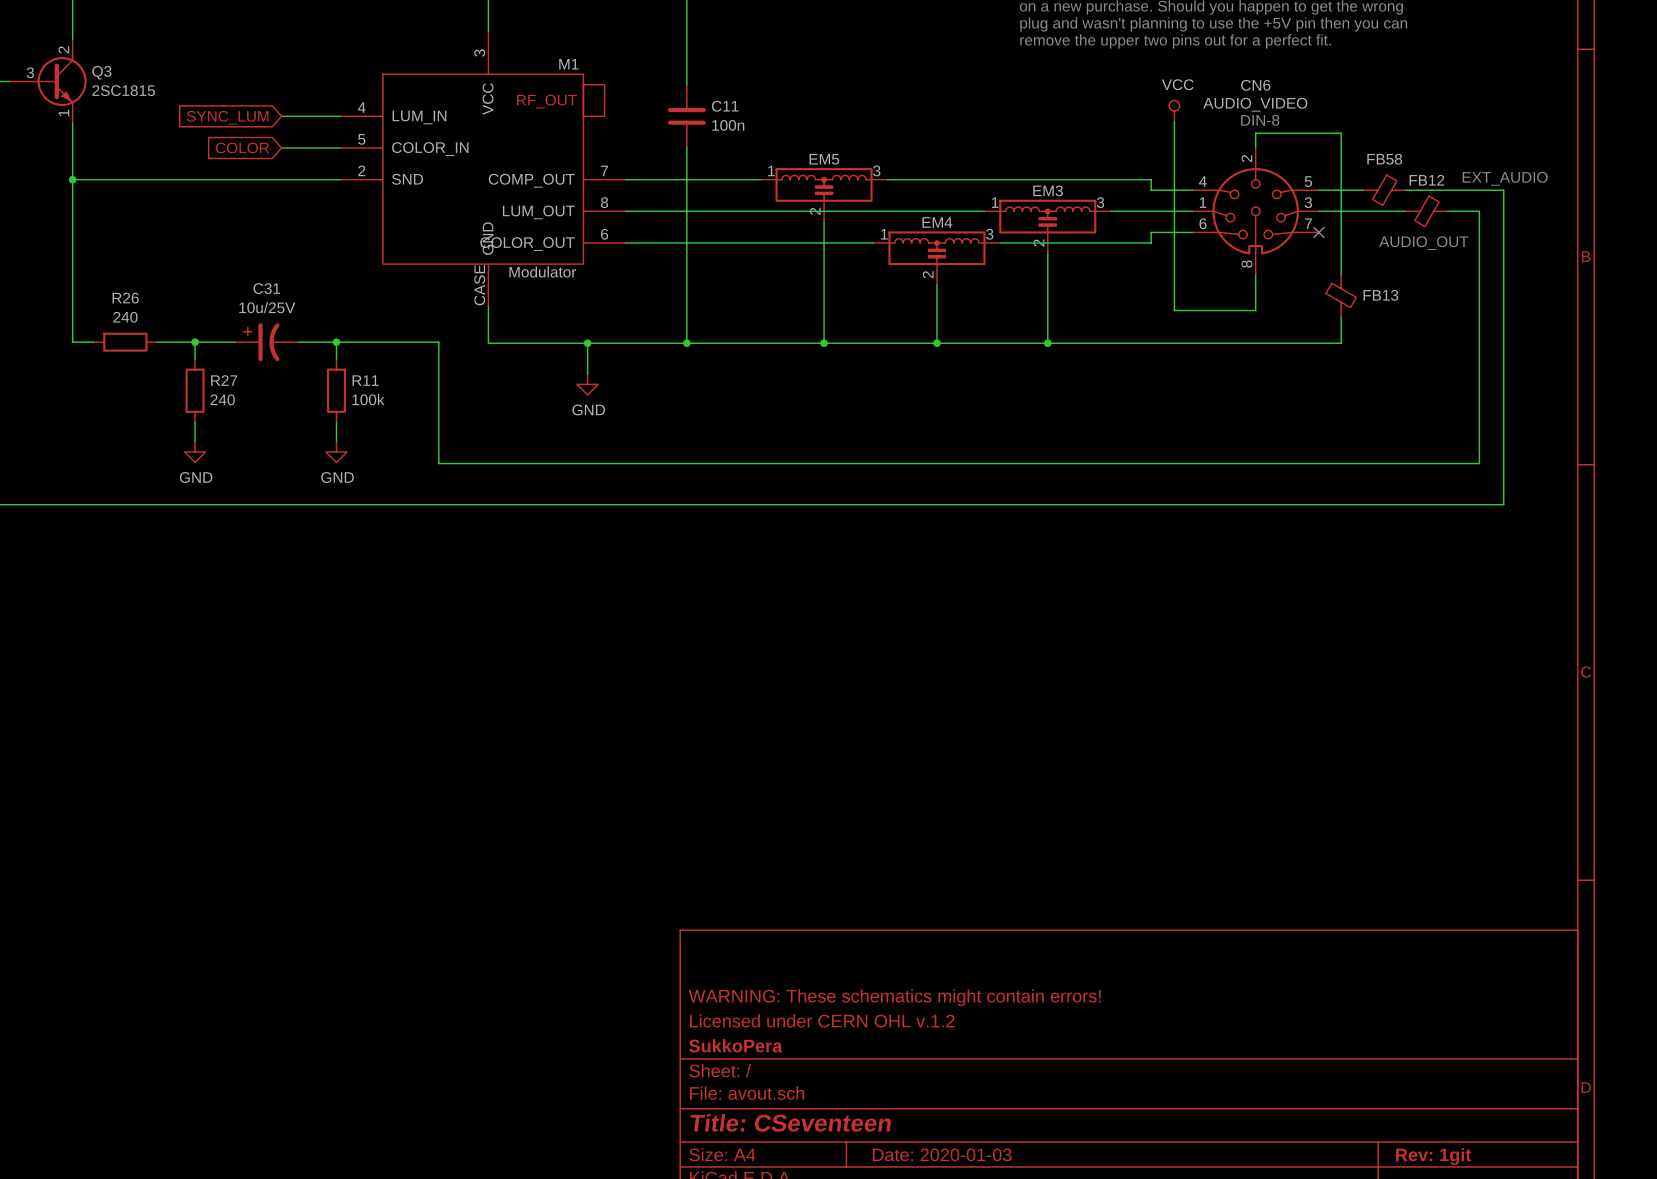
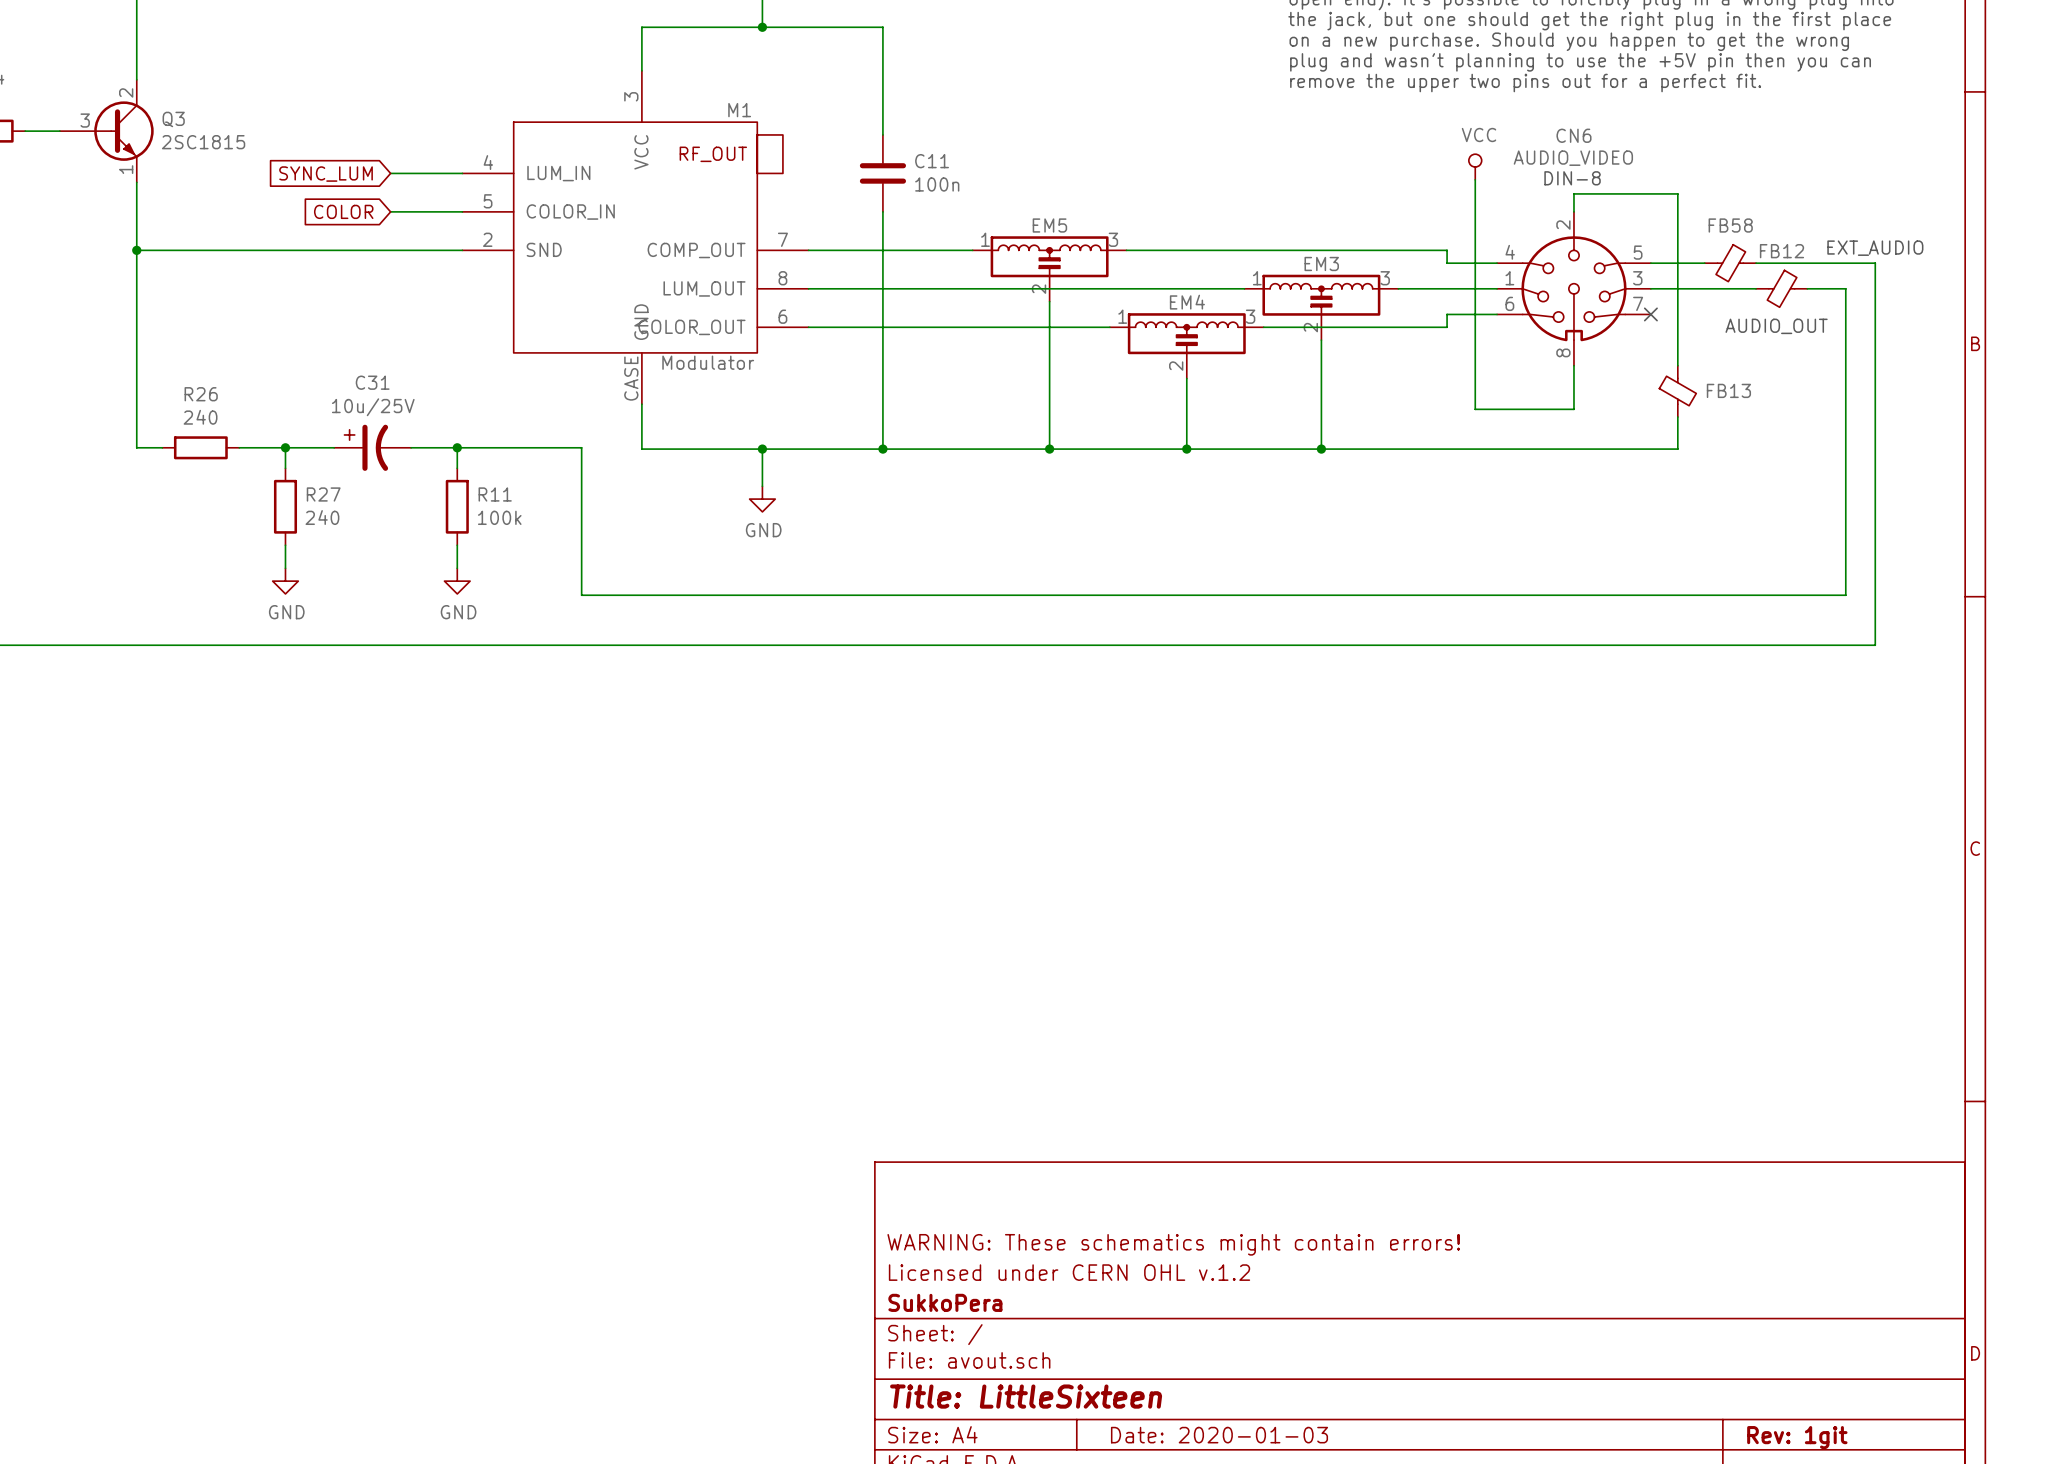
title block: Title: CSeventeen (790, 1122) -> Title: LittleSixteen (1026, 1396)

